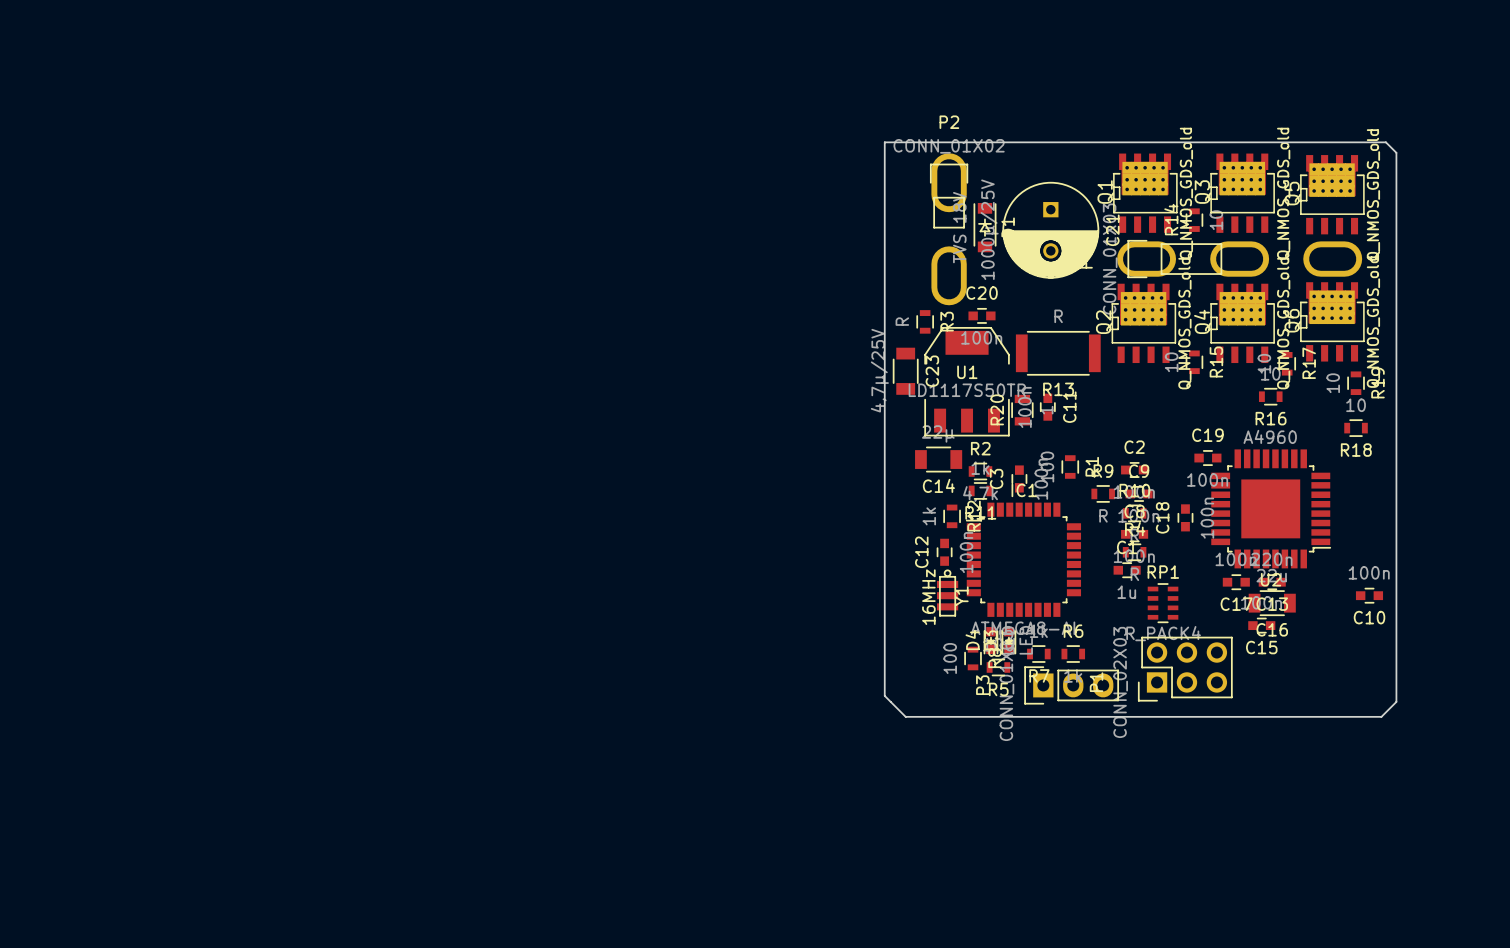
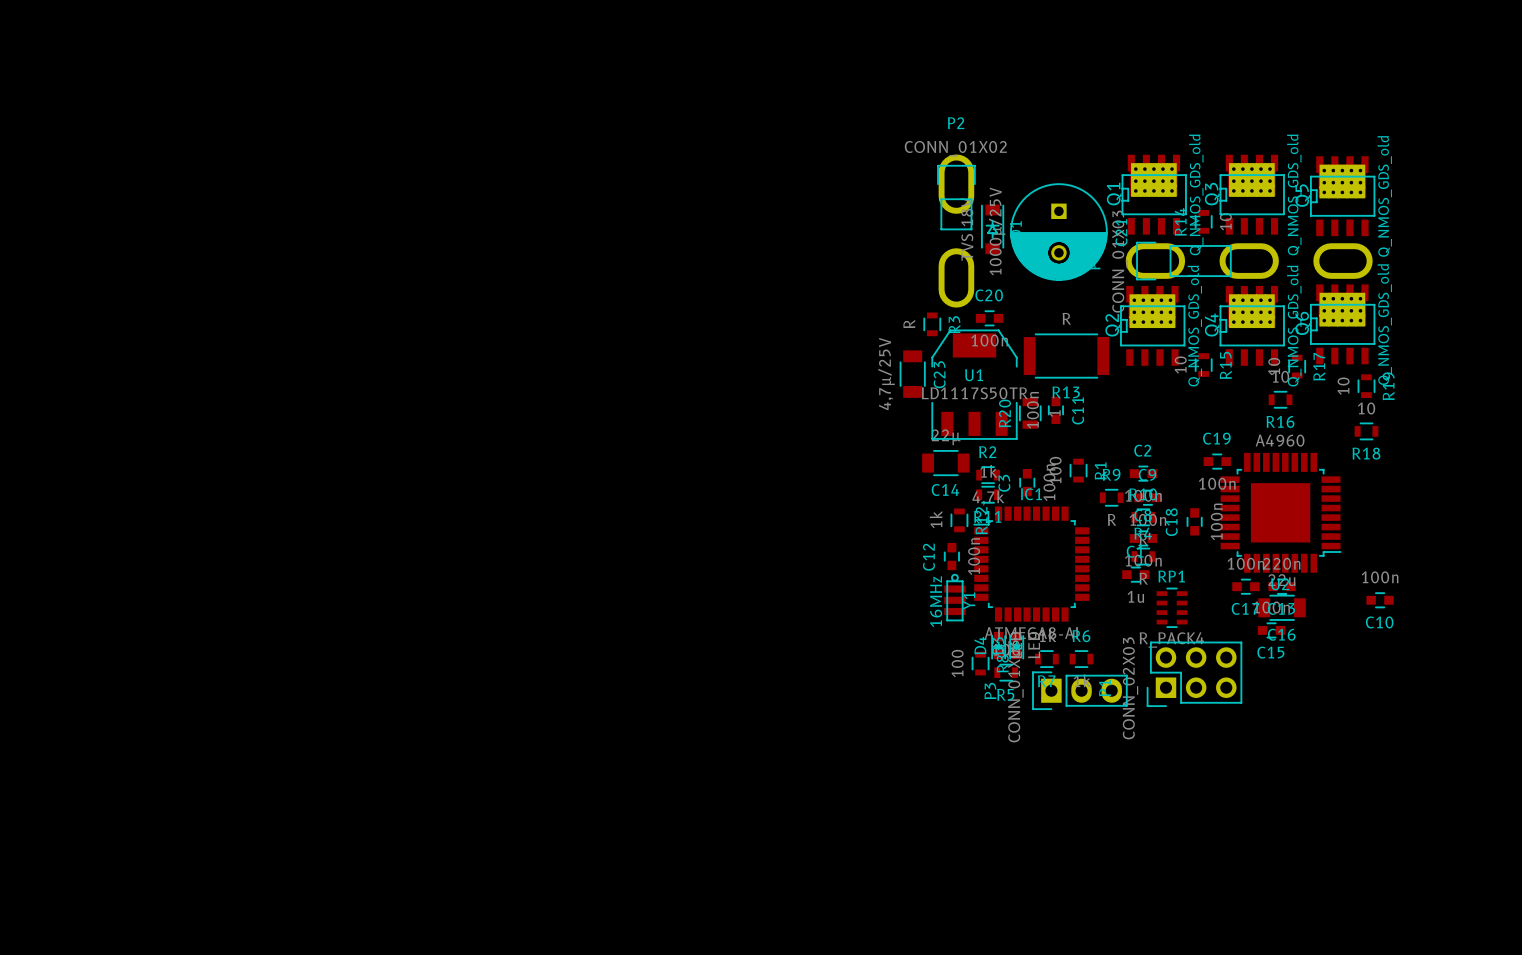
board edge: (884, 142) (1385, 142) (1396, 152) (1396, 701) (1381, 716) (905, 716) (884, 695) (884, 142) -> none
Q1 footprint: [1112, 153, 1178, 233] -> [1121, 154, 1187, 235]
Q3 footprint: [1210, 153, 1275, 233] -> [1219, 154, 1285, 235]
Q5 footprint: [1299, 155, 1365, 235] -> [1309, 156, 1376, 237]
Q6 footprint: [1299, 282, 1365, 362] -> [1309, 284, 1376, 365]
Q2 footprint: [1111, 283, 1177, 364] -> [1120, 285, 1186, 366]
Q4 footprint: [1210, 283, 1275, 364] -> [1219, 285, 1285, 366]

